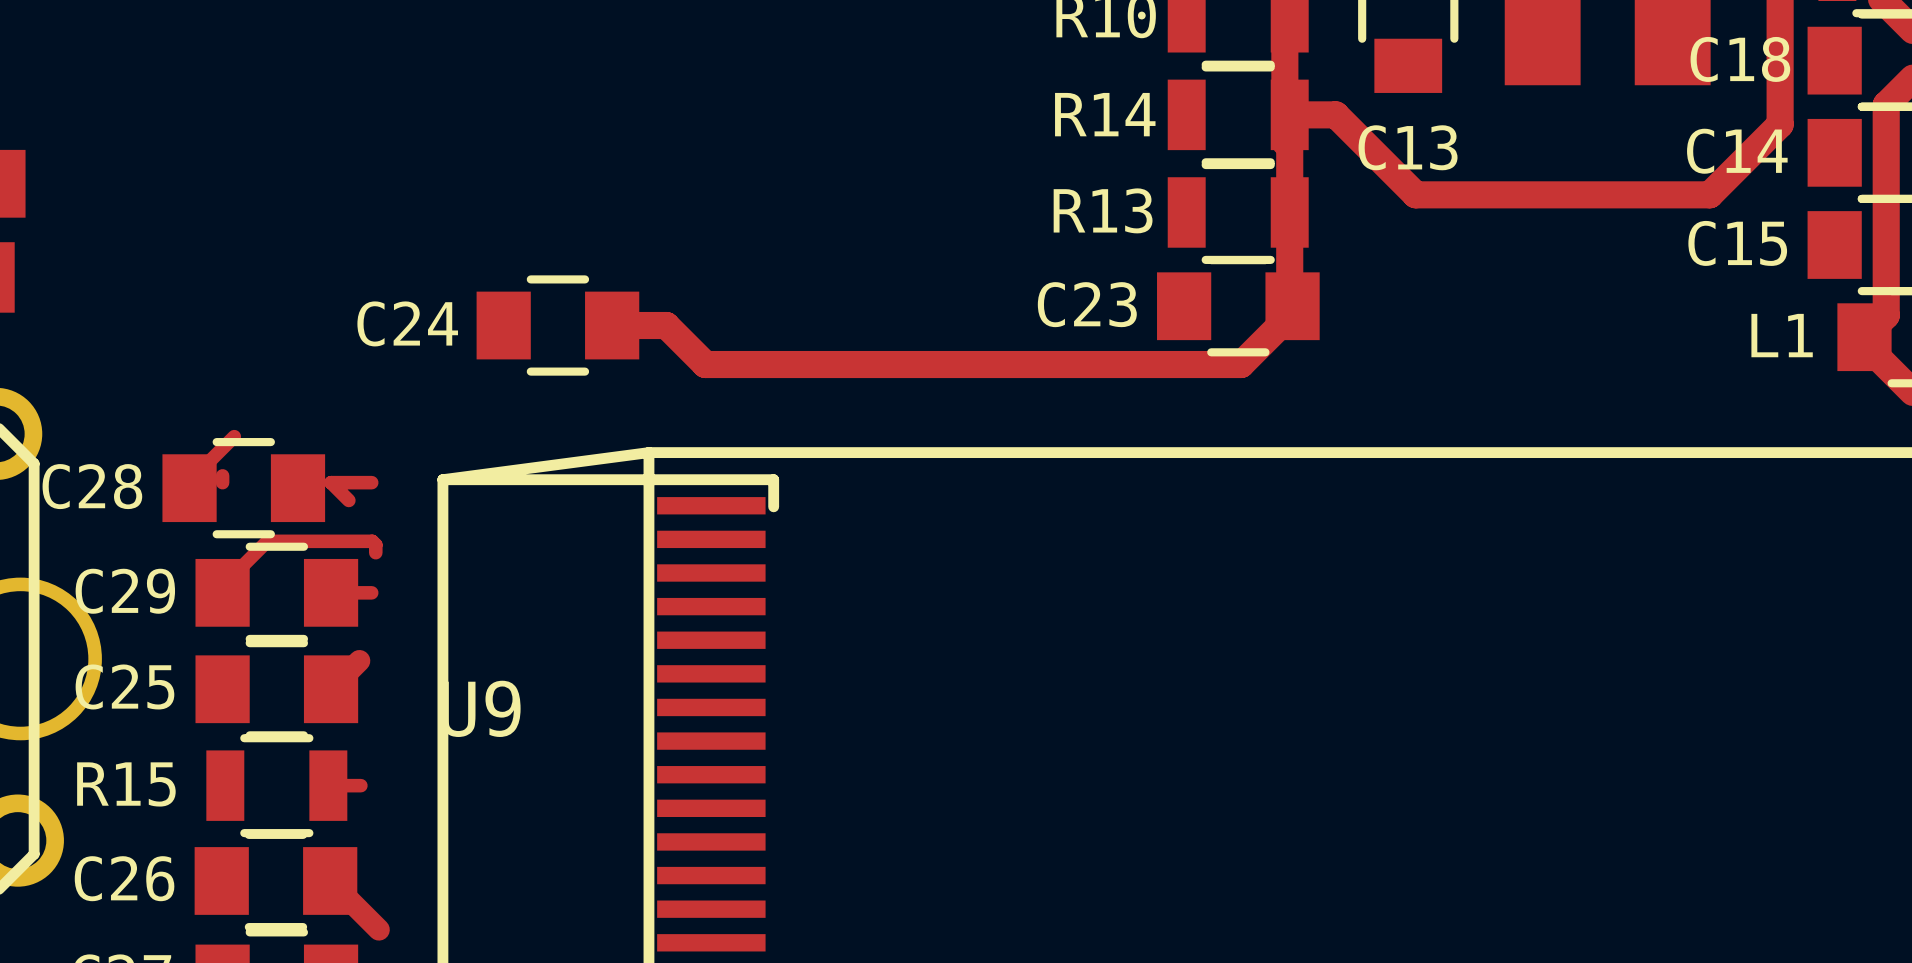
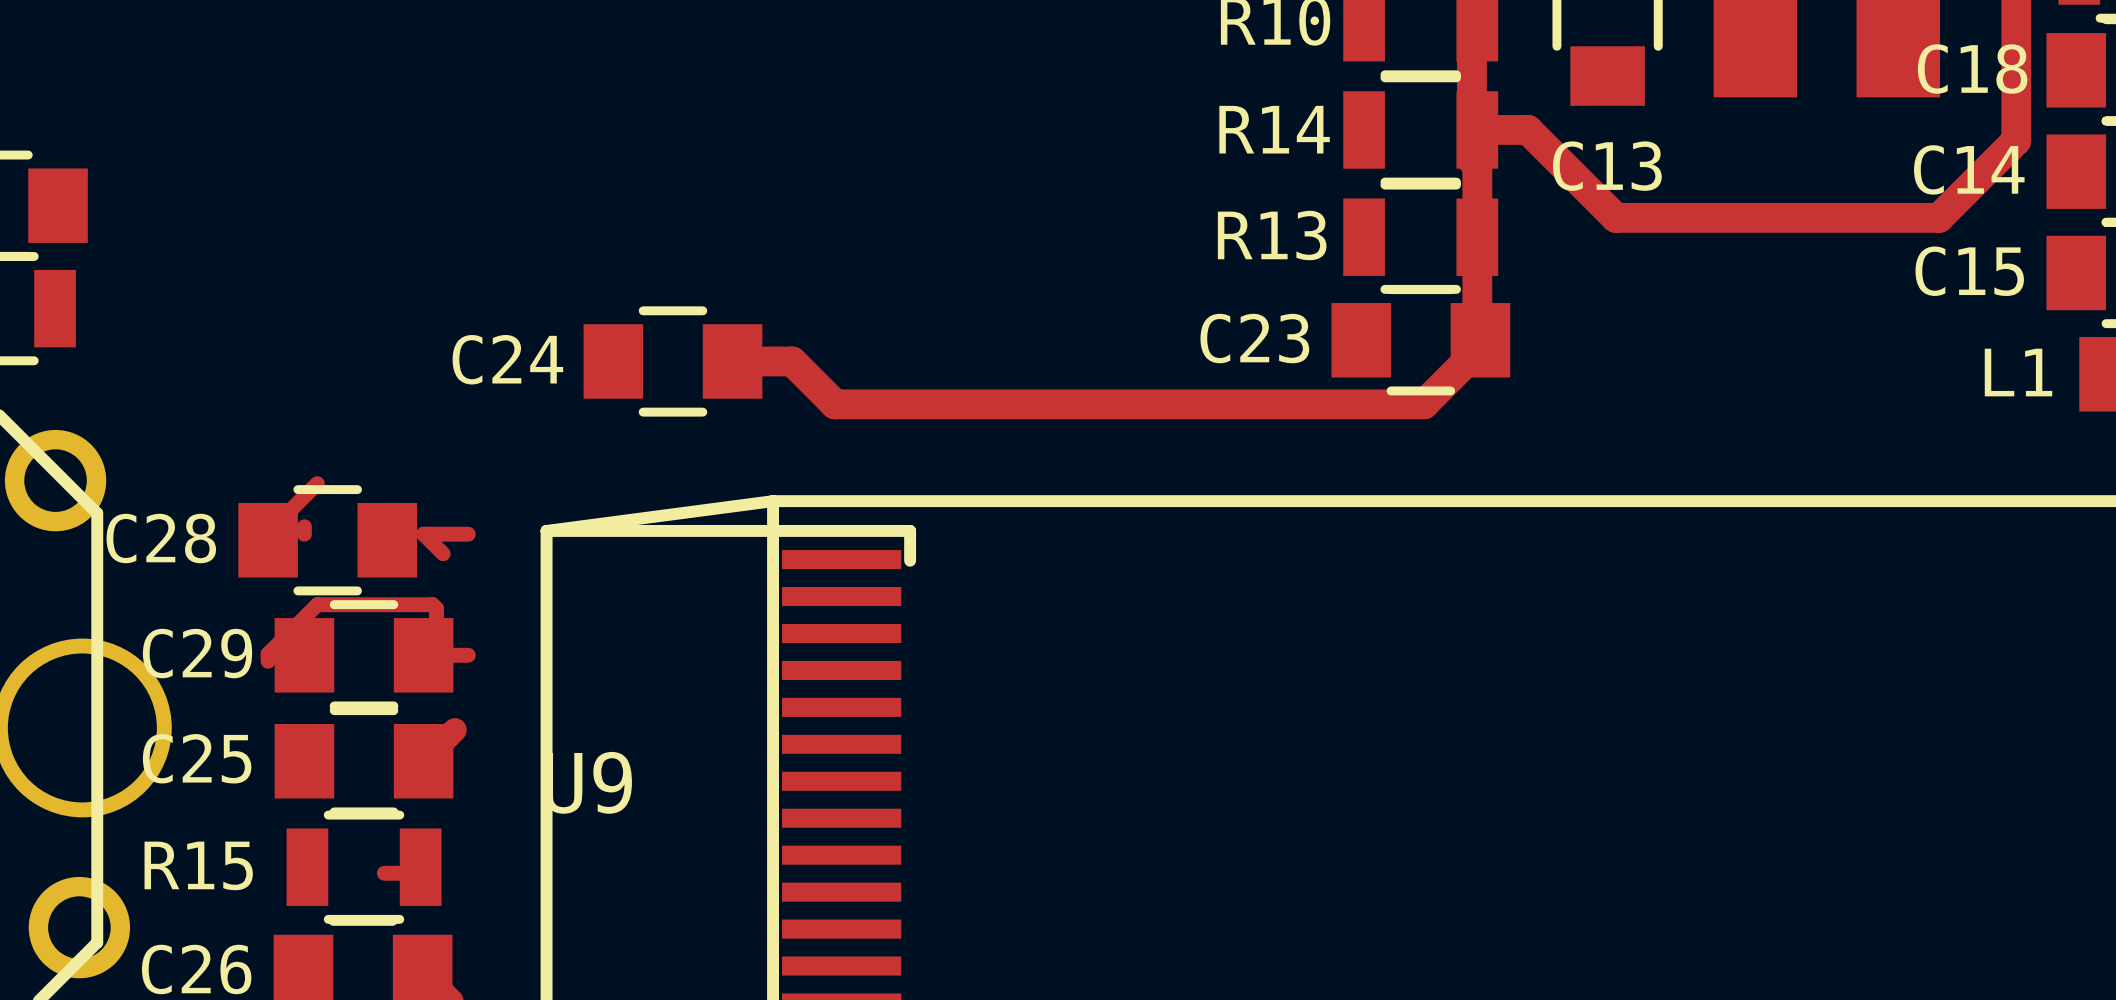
track: (375, 552) (375, 544) (372, 541) (267, 541) (222, 586) (222, 592) -> (436, 617) (436, 608) (432, 604) (317, 604) (268, 653) (268, 661)
track: (328, 785) (360, 785) -> (384, 873) (420, 873)

